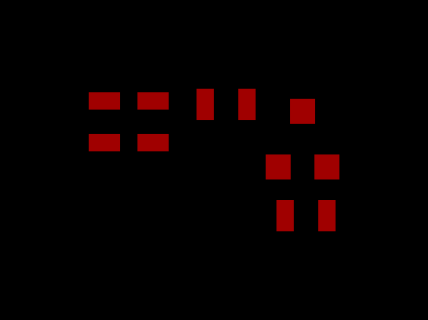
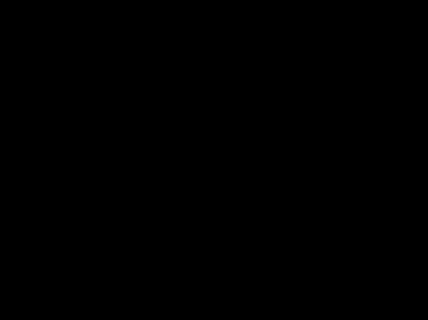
part: (226, 104) -> none
part: (104, 121) -> none
part: (153, 121) -> none
part: (302, 139) -> none
part: (306, 215) -> none

